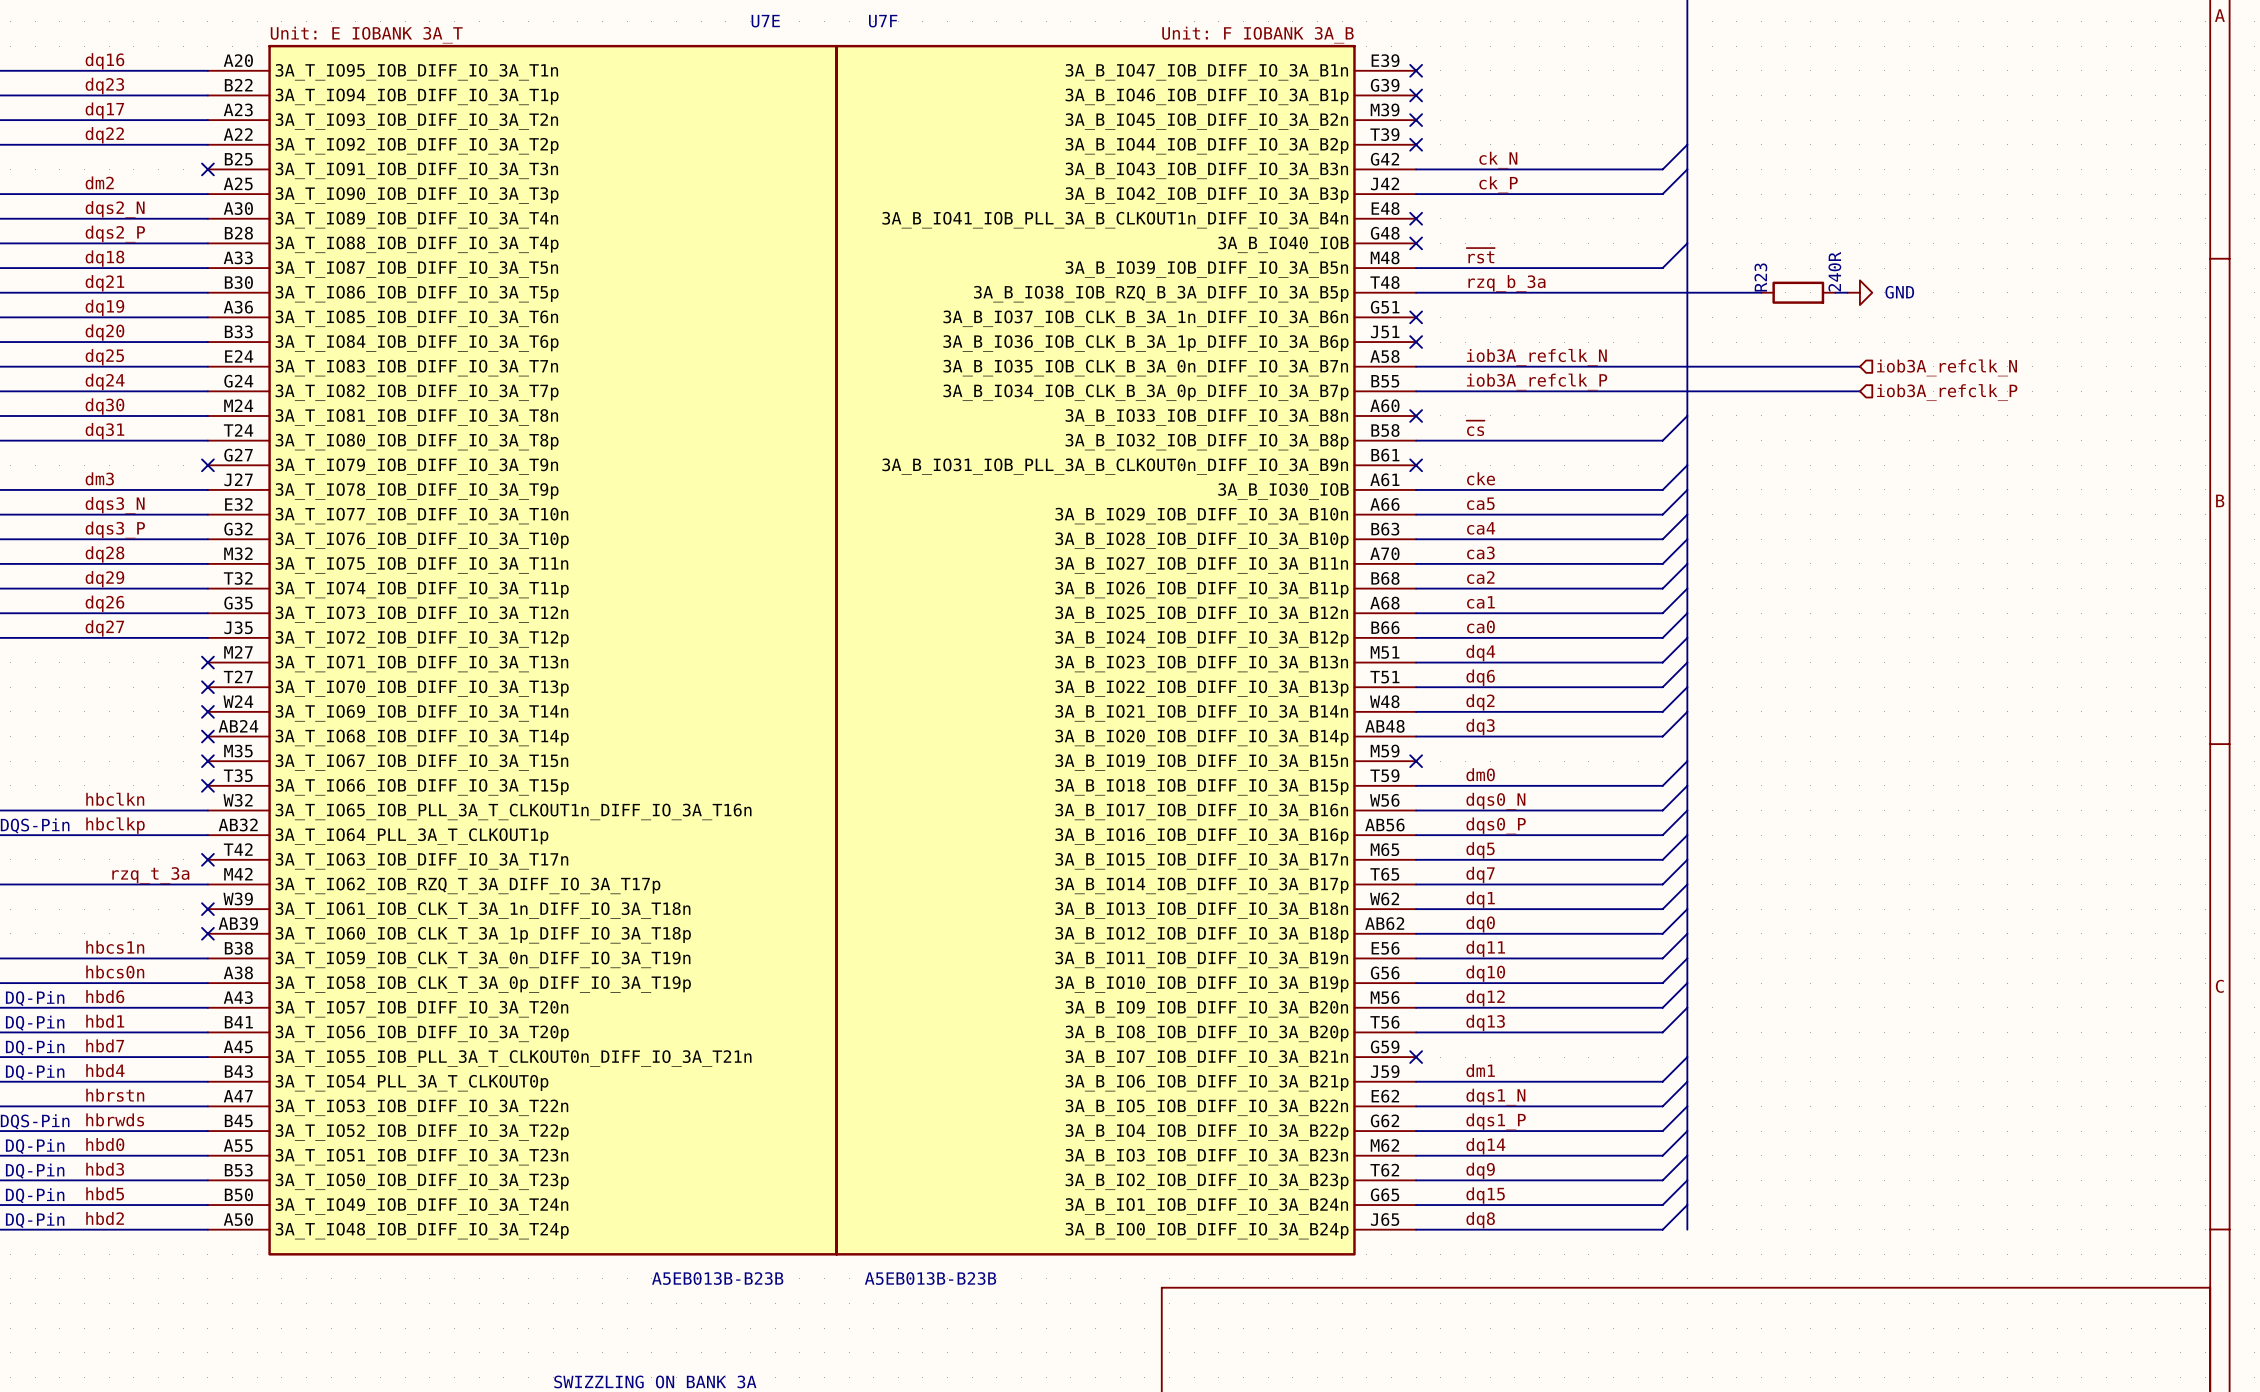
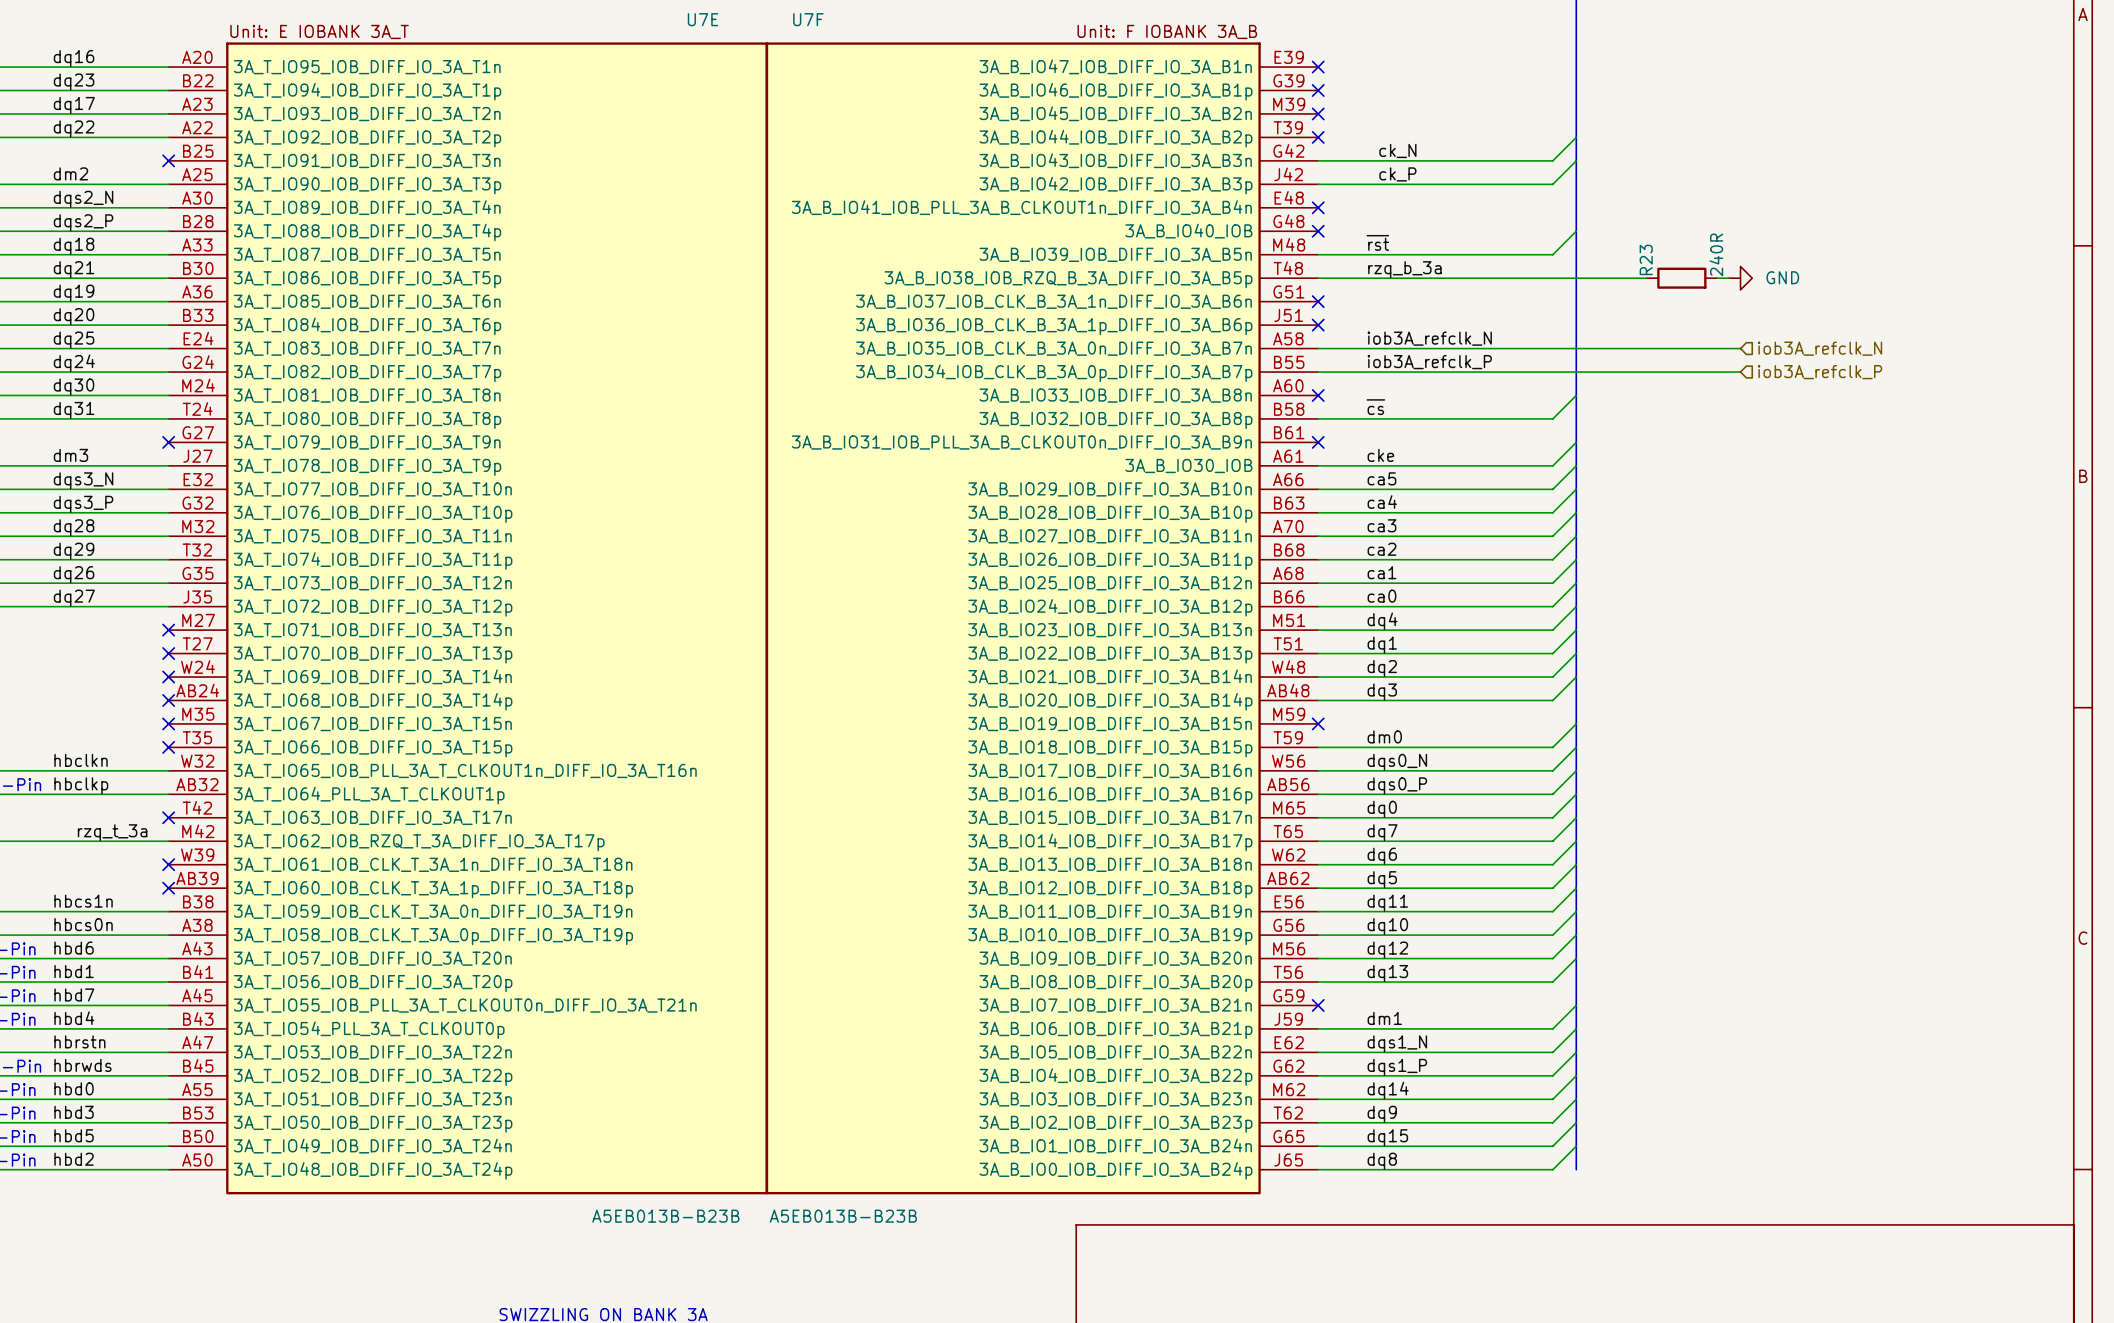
label: dq6 (1480, 677) -> dq1 (1382, 645)
label: dq5 (1480, 850) -> dq0 (1382, 809)
label: dq1 (1480, 899) -> dq6 (1382, 856)
label: dq0 (1480, 924) -> dq5 (1382, 879)

